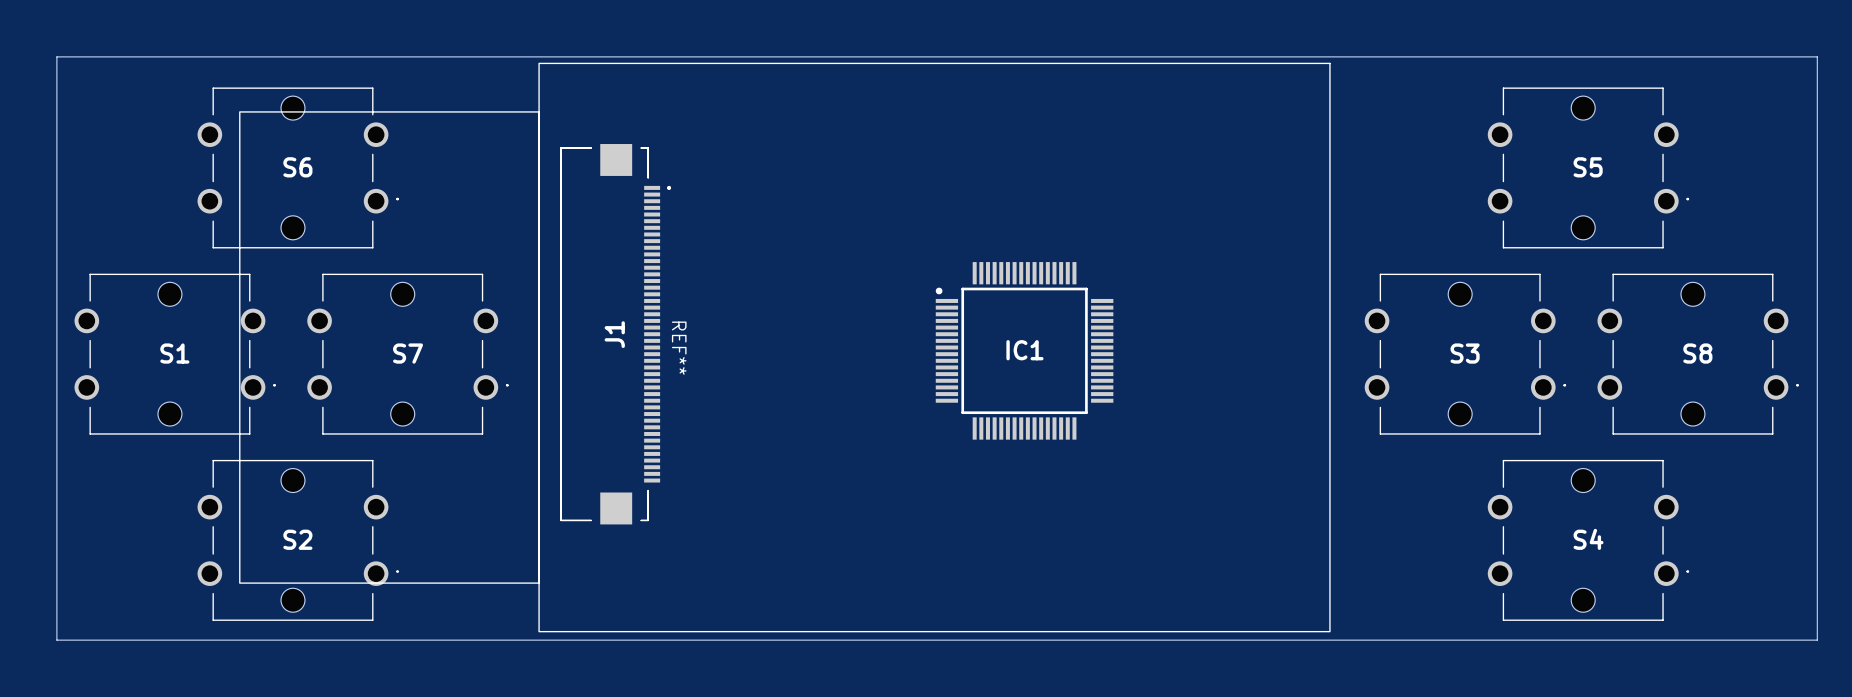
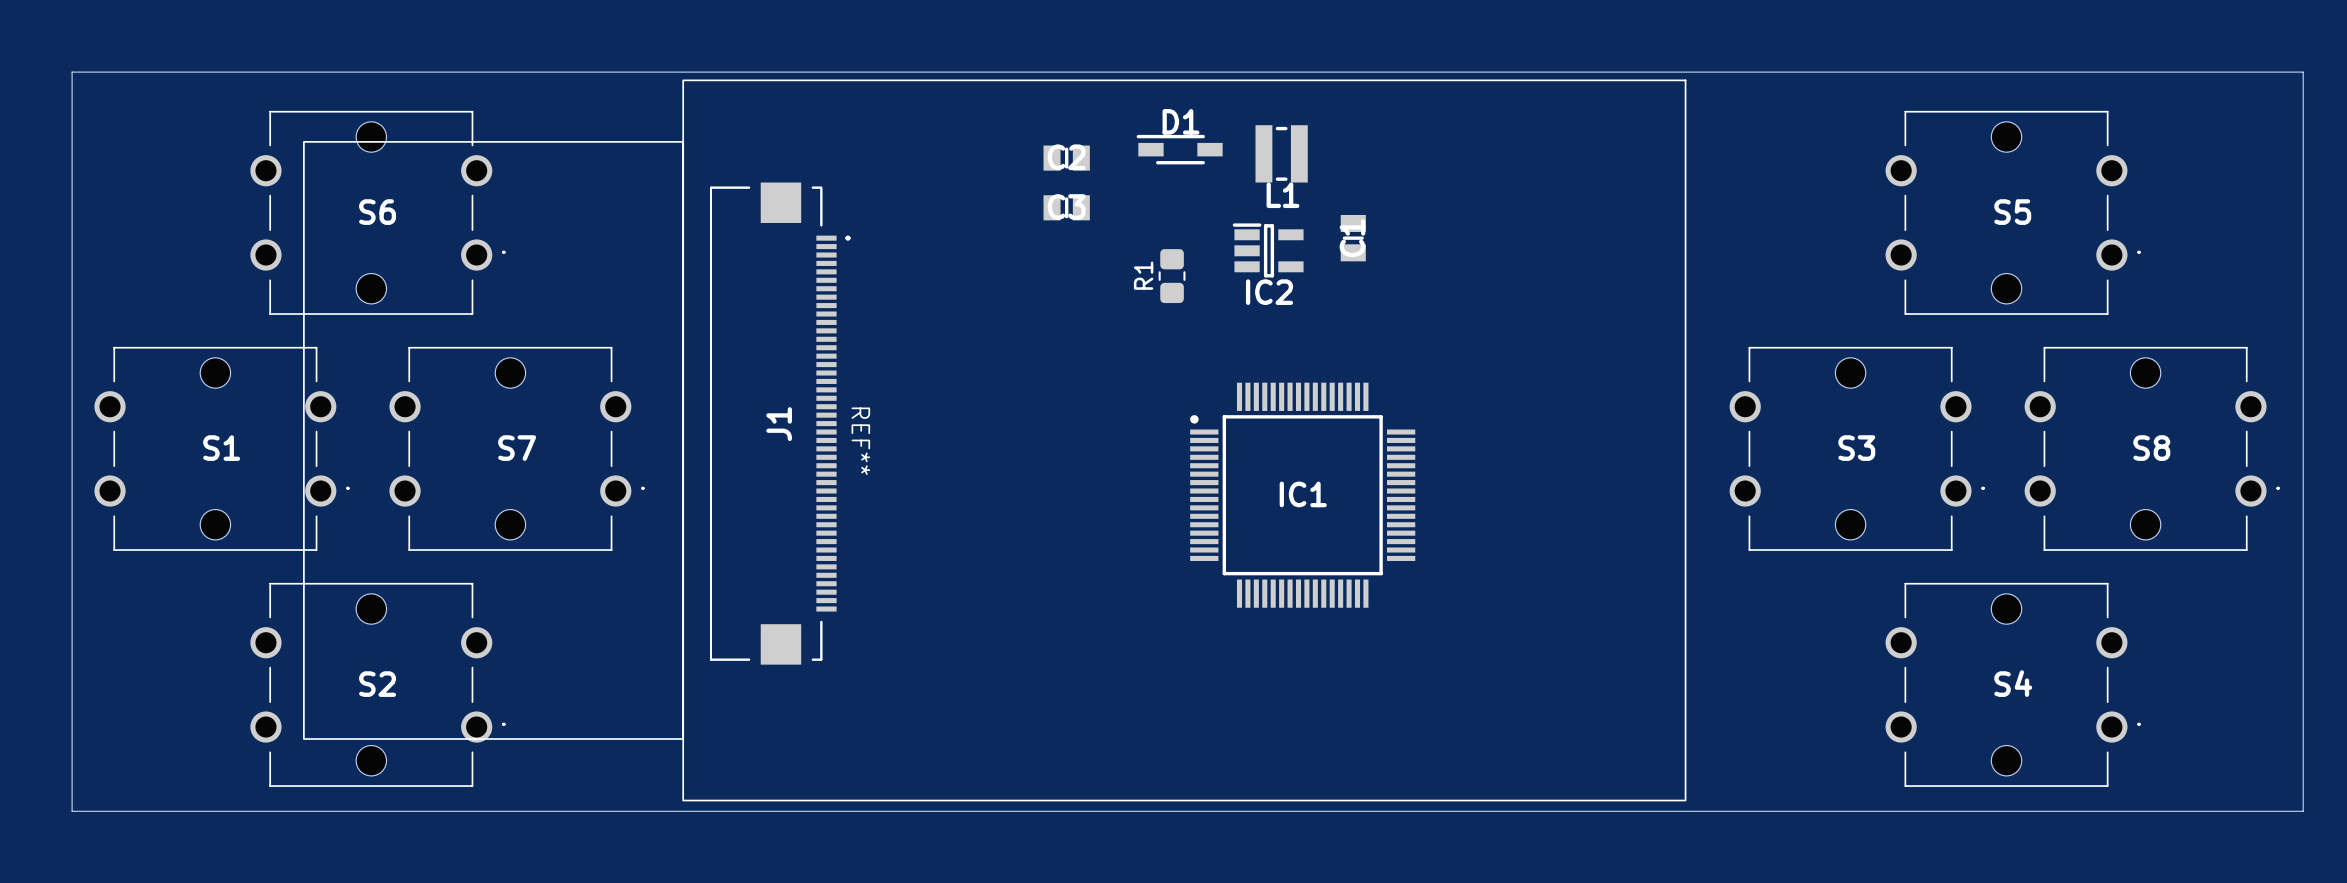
D1: none -> (1179, 149)
L1: none -> (1281, 153)
part: none -> (1066, 158)
part: none -> (1066, 207)
part: none -> (1353, 238)
IC2: none -> (1268, 250)
R1: none -> (1172, 276)
IC1 position: (1024, 350) -> (1302, 495)

